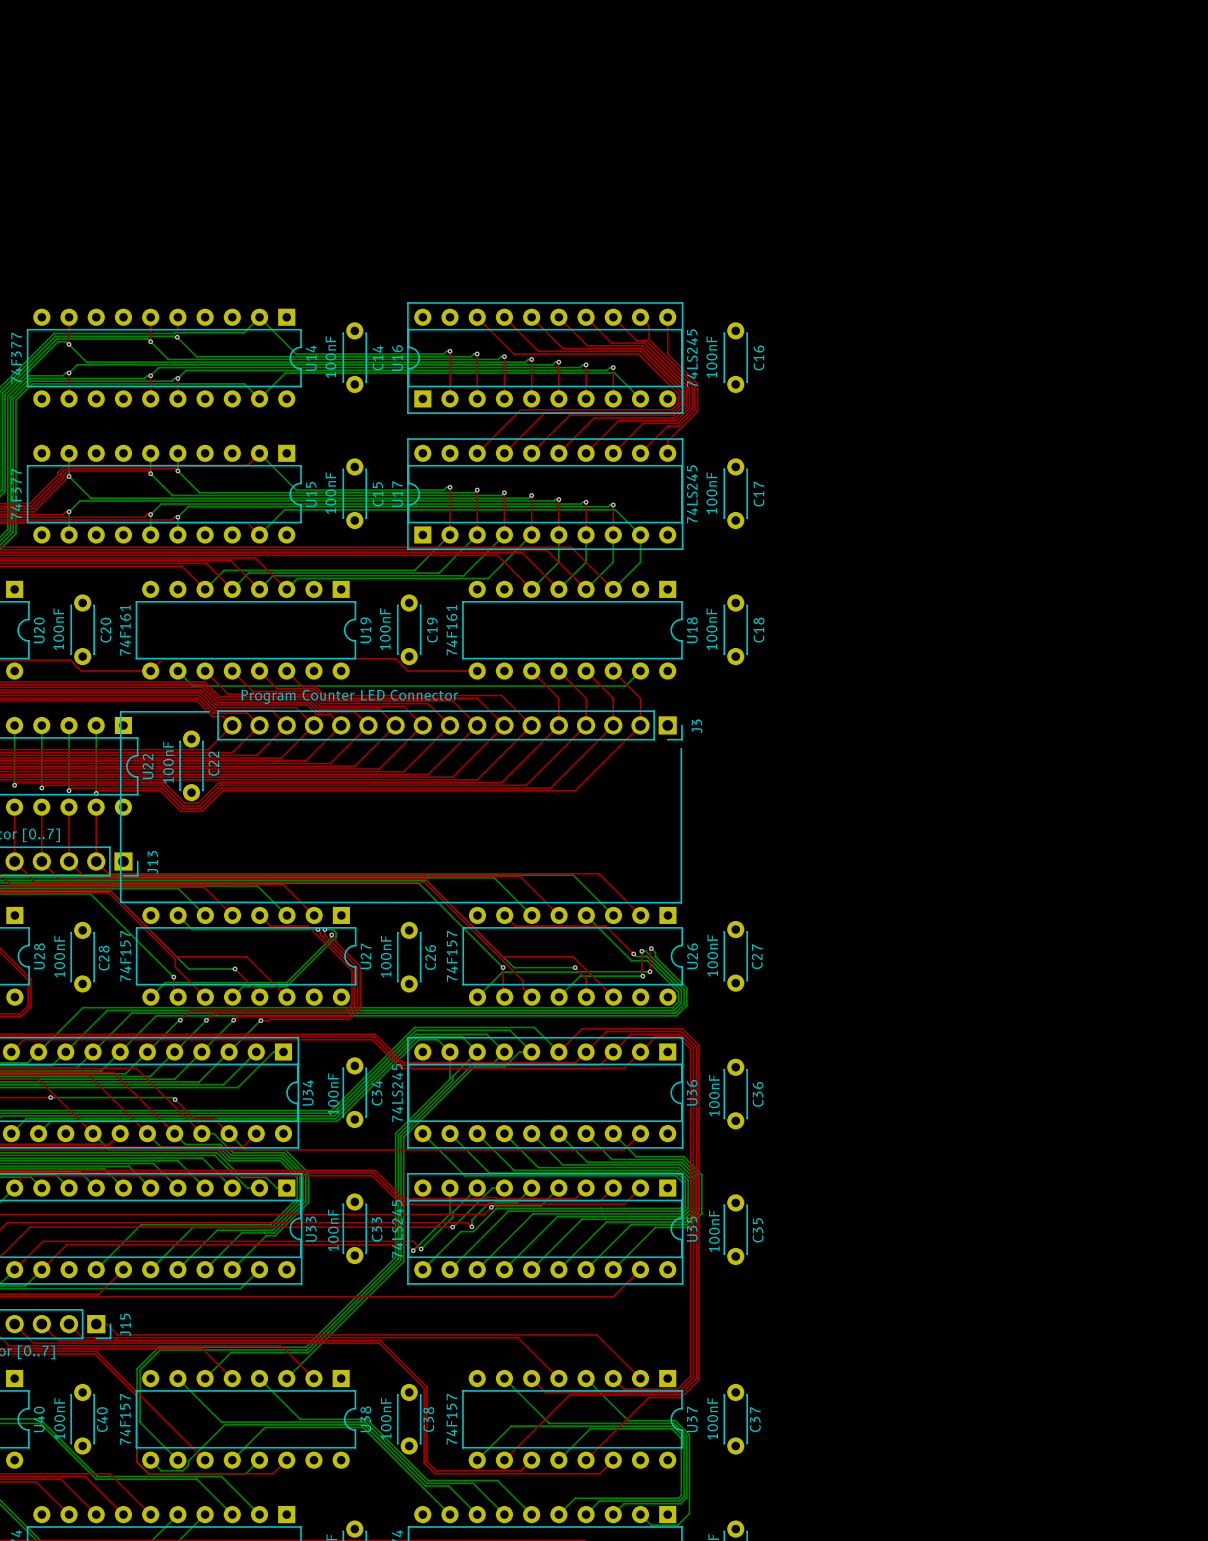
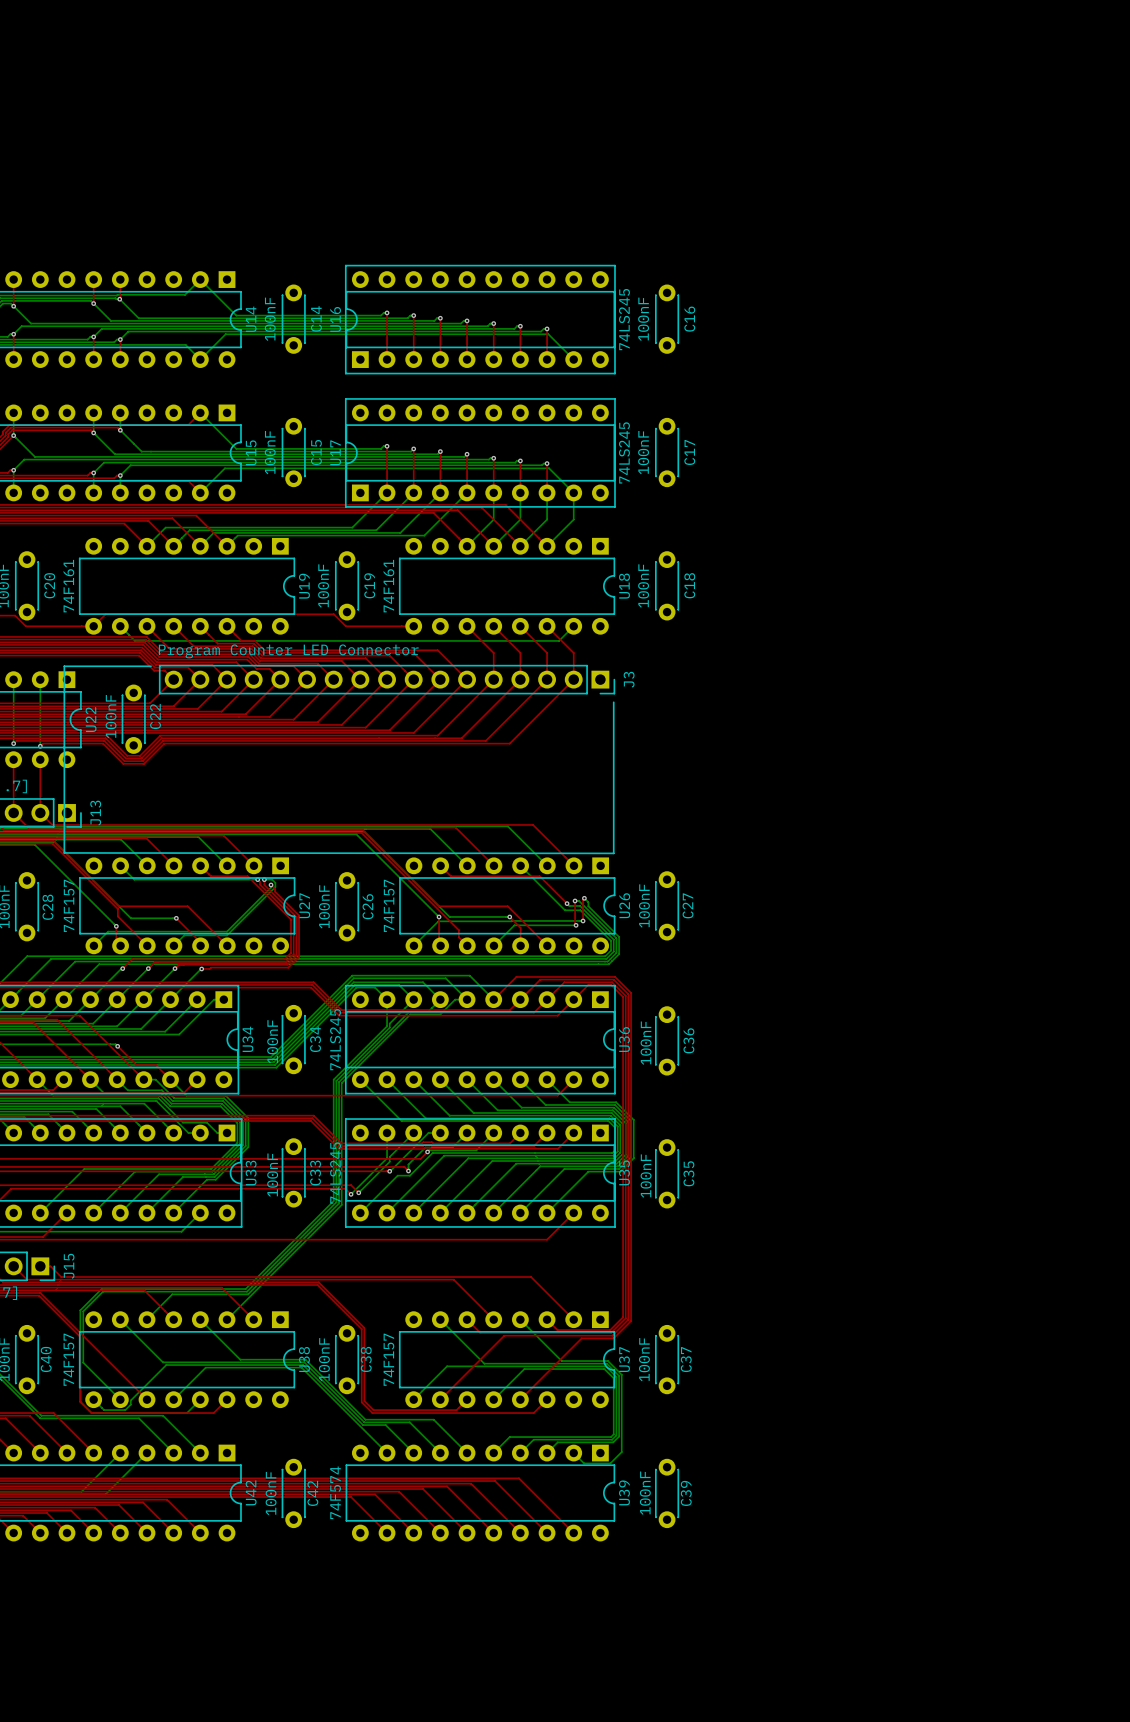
top track: (477, 317) (513, 353) (638, 353) (678, 393) (678, 403) (672, 409) (520, 409) (477, 453) -> none
top track: (504, 317) (538, 351) (640, 351) (681, 392) (681, 404) (673, 412) (545, 412) (504, 453) -> none
top track: (531, 317) (562, 348) (641, 348) (684, 390) (684, 405) (674, 415) (569, 415) (531, 453) -> none
top track: (558, 317) (587, 345) (643, 345) (686, 389) (686, 406) (675, 417) (594, 417) (558, 453) -> none
top track: (586, 317) (611, 343) (644, 343) (689, 388) (689, 407) (676, 420) (618, 420) (586, 453) -> none
top track: (613, 317) (636, 340) (645, 340) (692, 386) (692, 409) (677, 423) (643, 423) (613, 453) -> none
top track: (640, 317) (649, 325) (649, 339) (694, 385) (694, 410) (679, 426) (667, 426) (640, 453) -> none
top track: (667, 317) (667, 353) (697, 383) (697, 411) (667, 441) (667, 453) -> none

